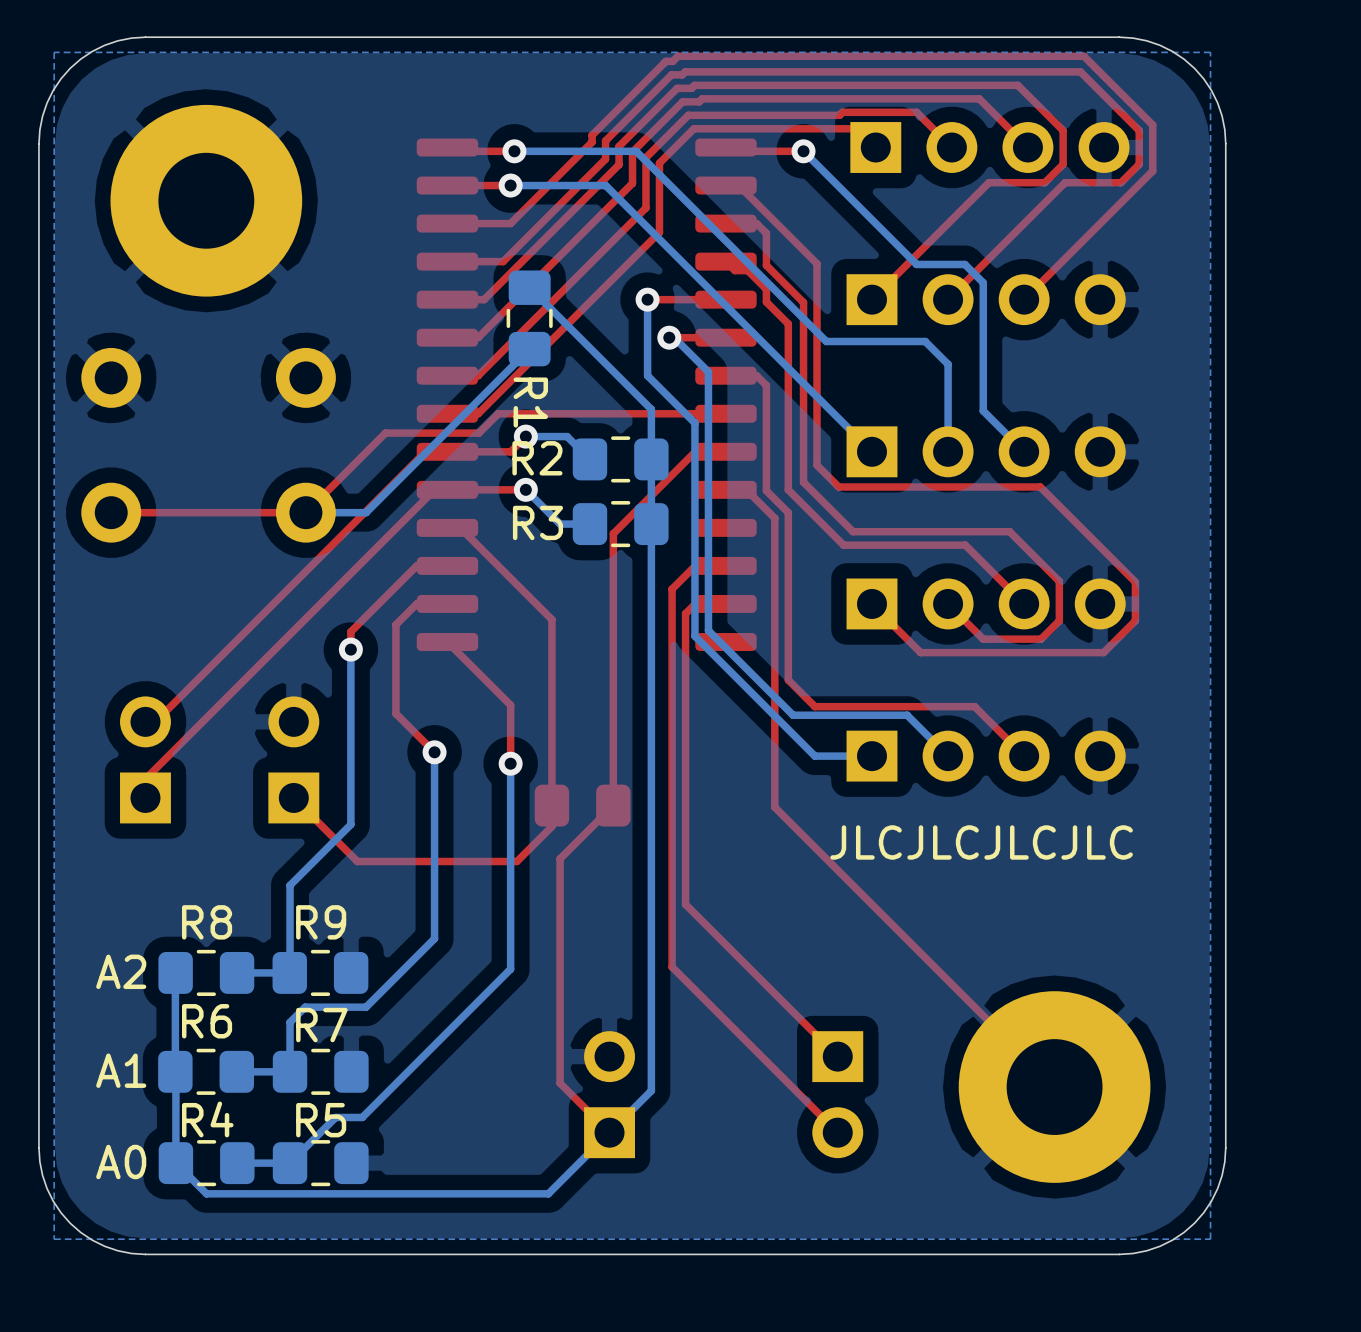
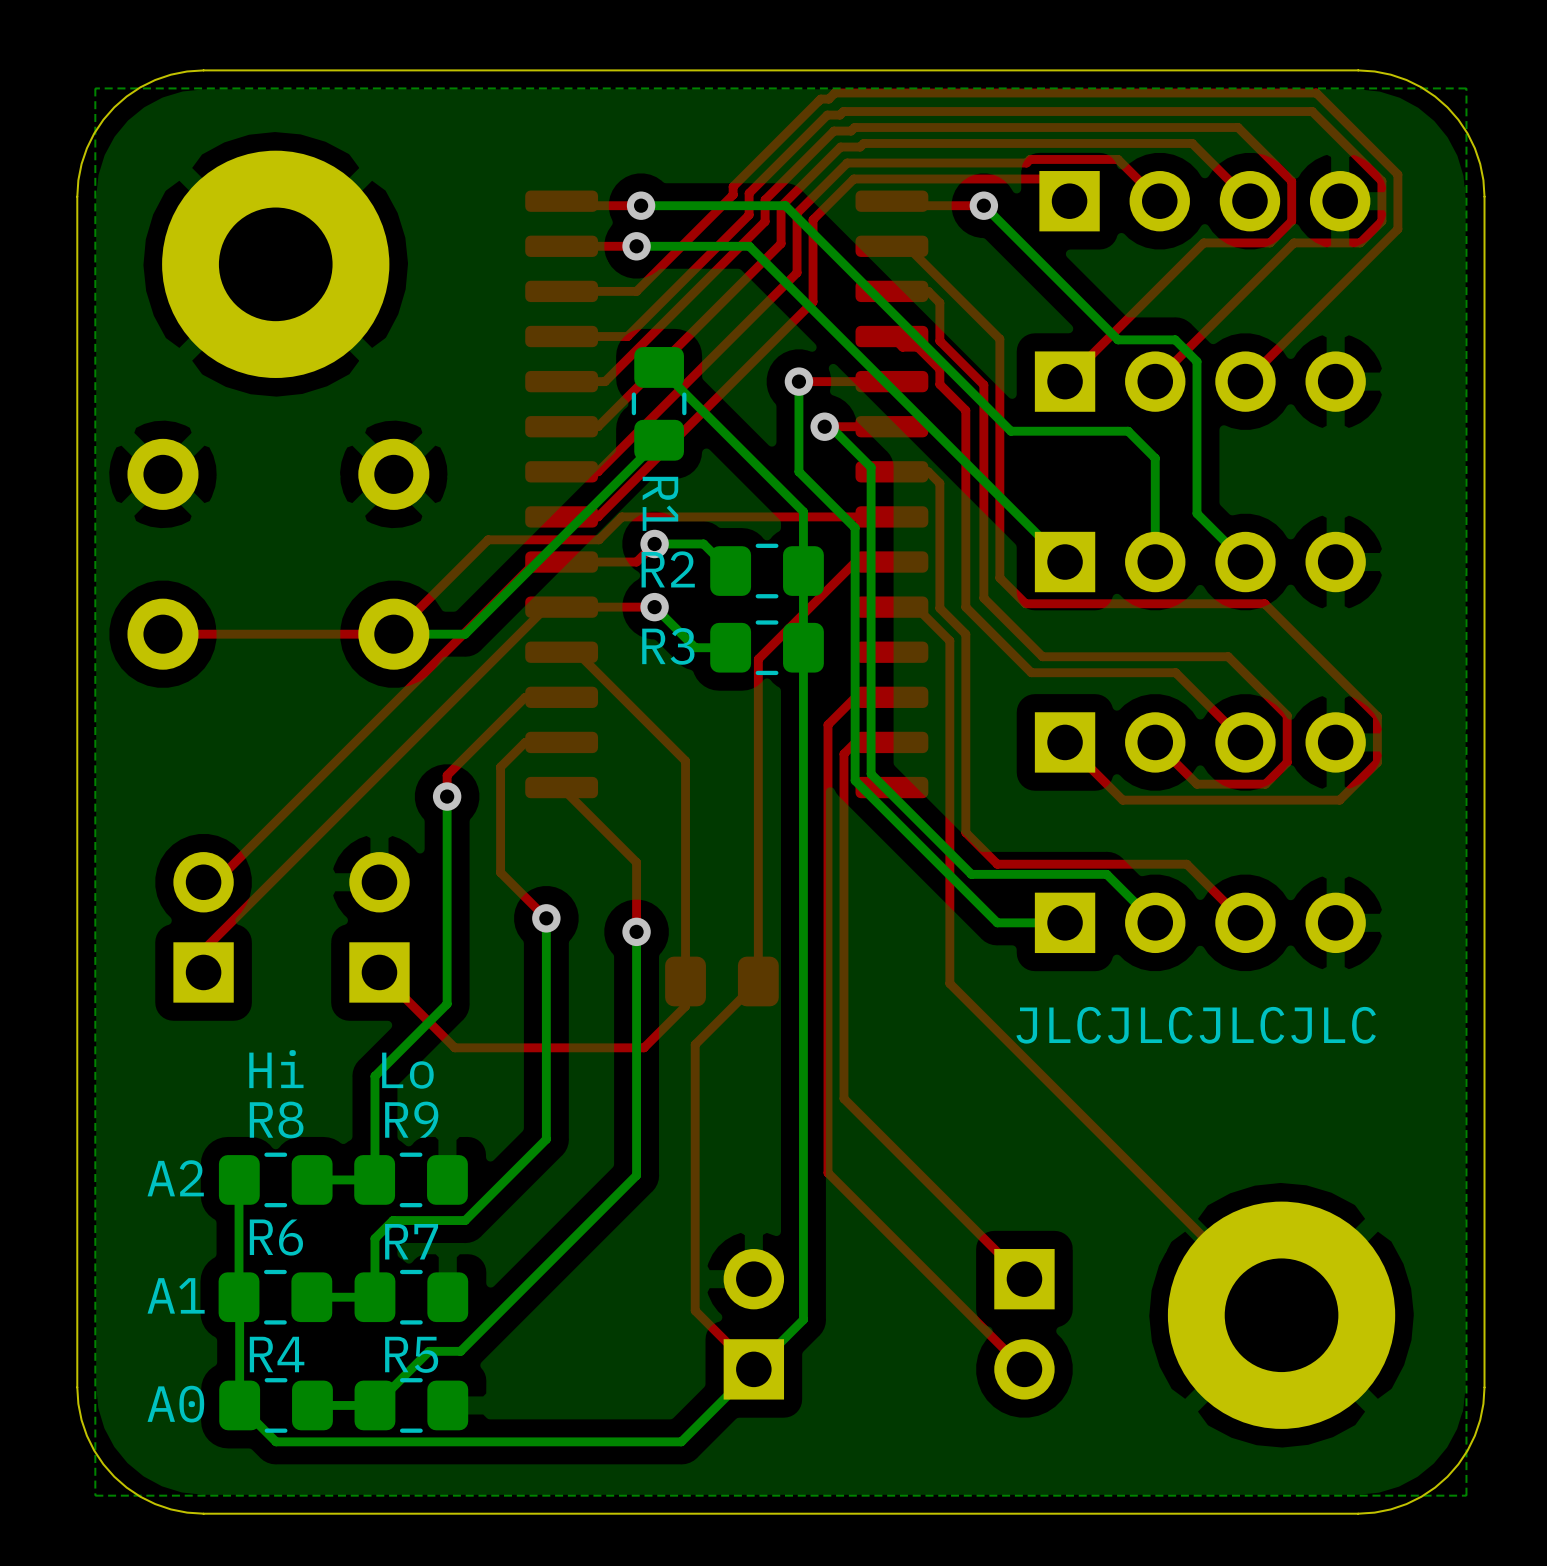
text: none -> Hi (276, 1069)
text: none -> Lo (407, 1070)

